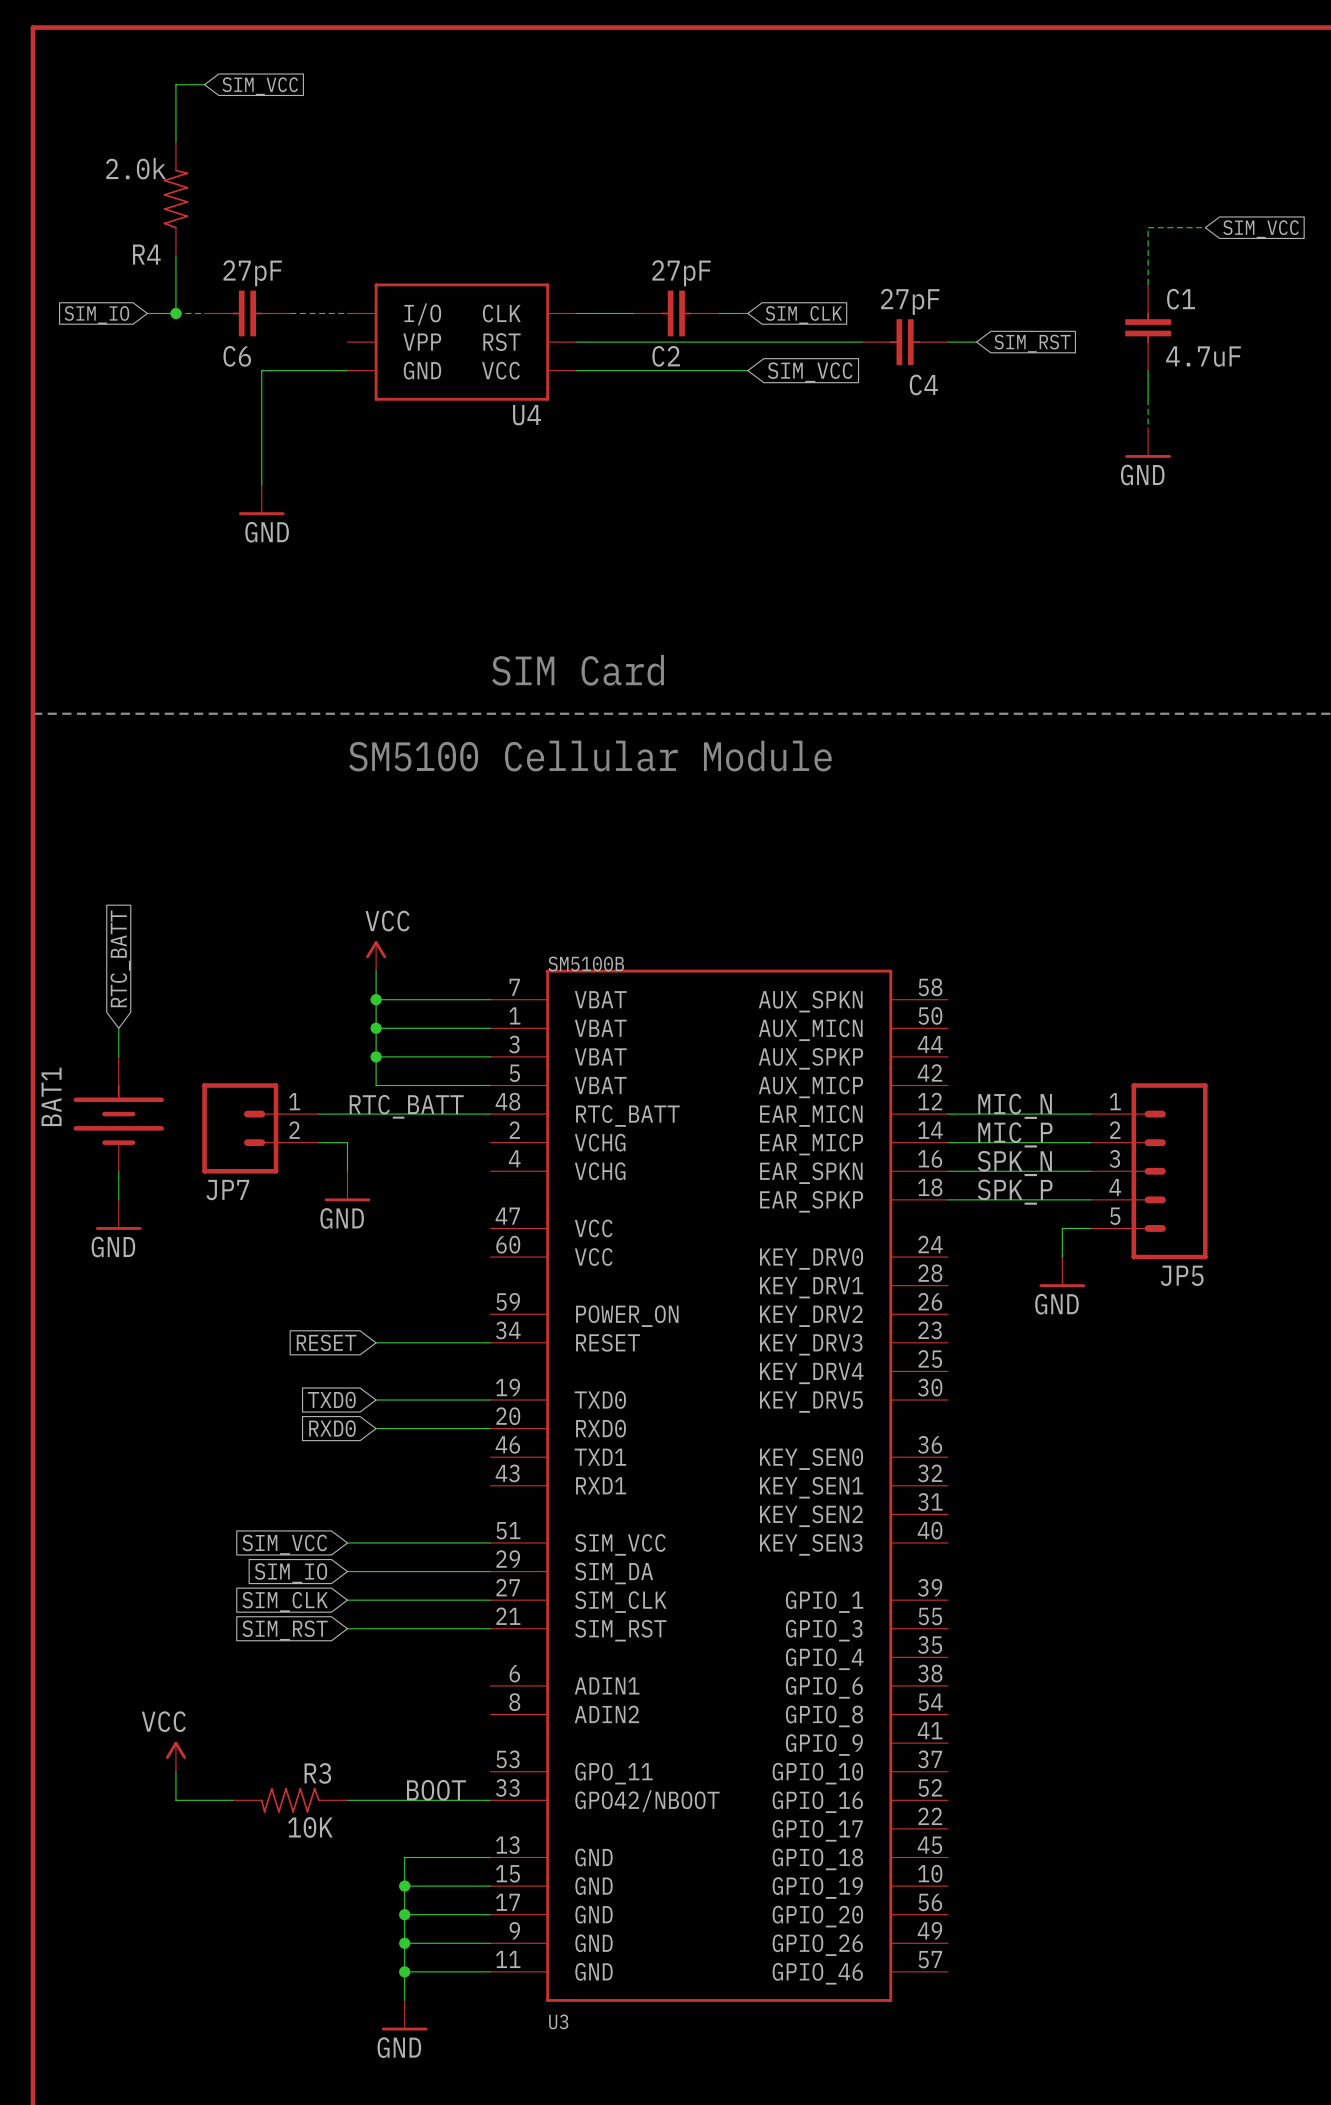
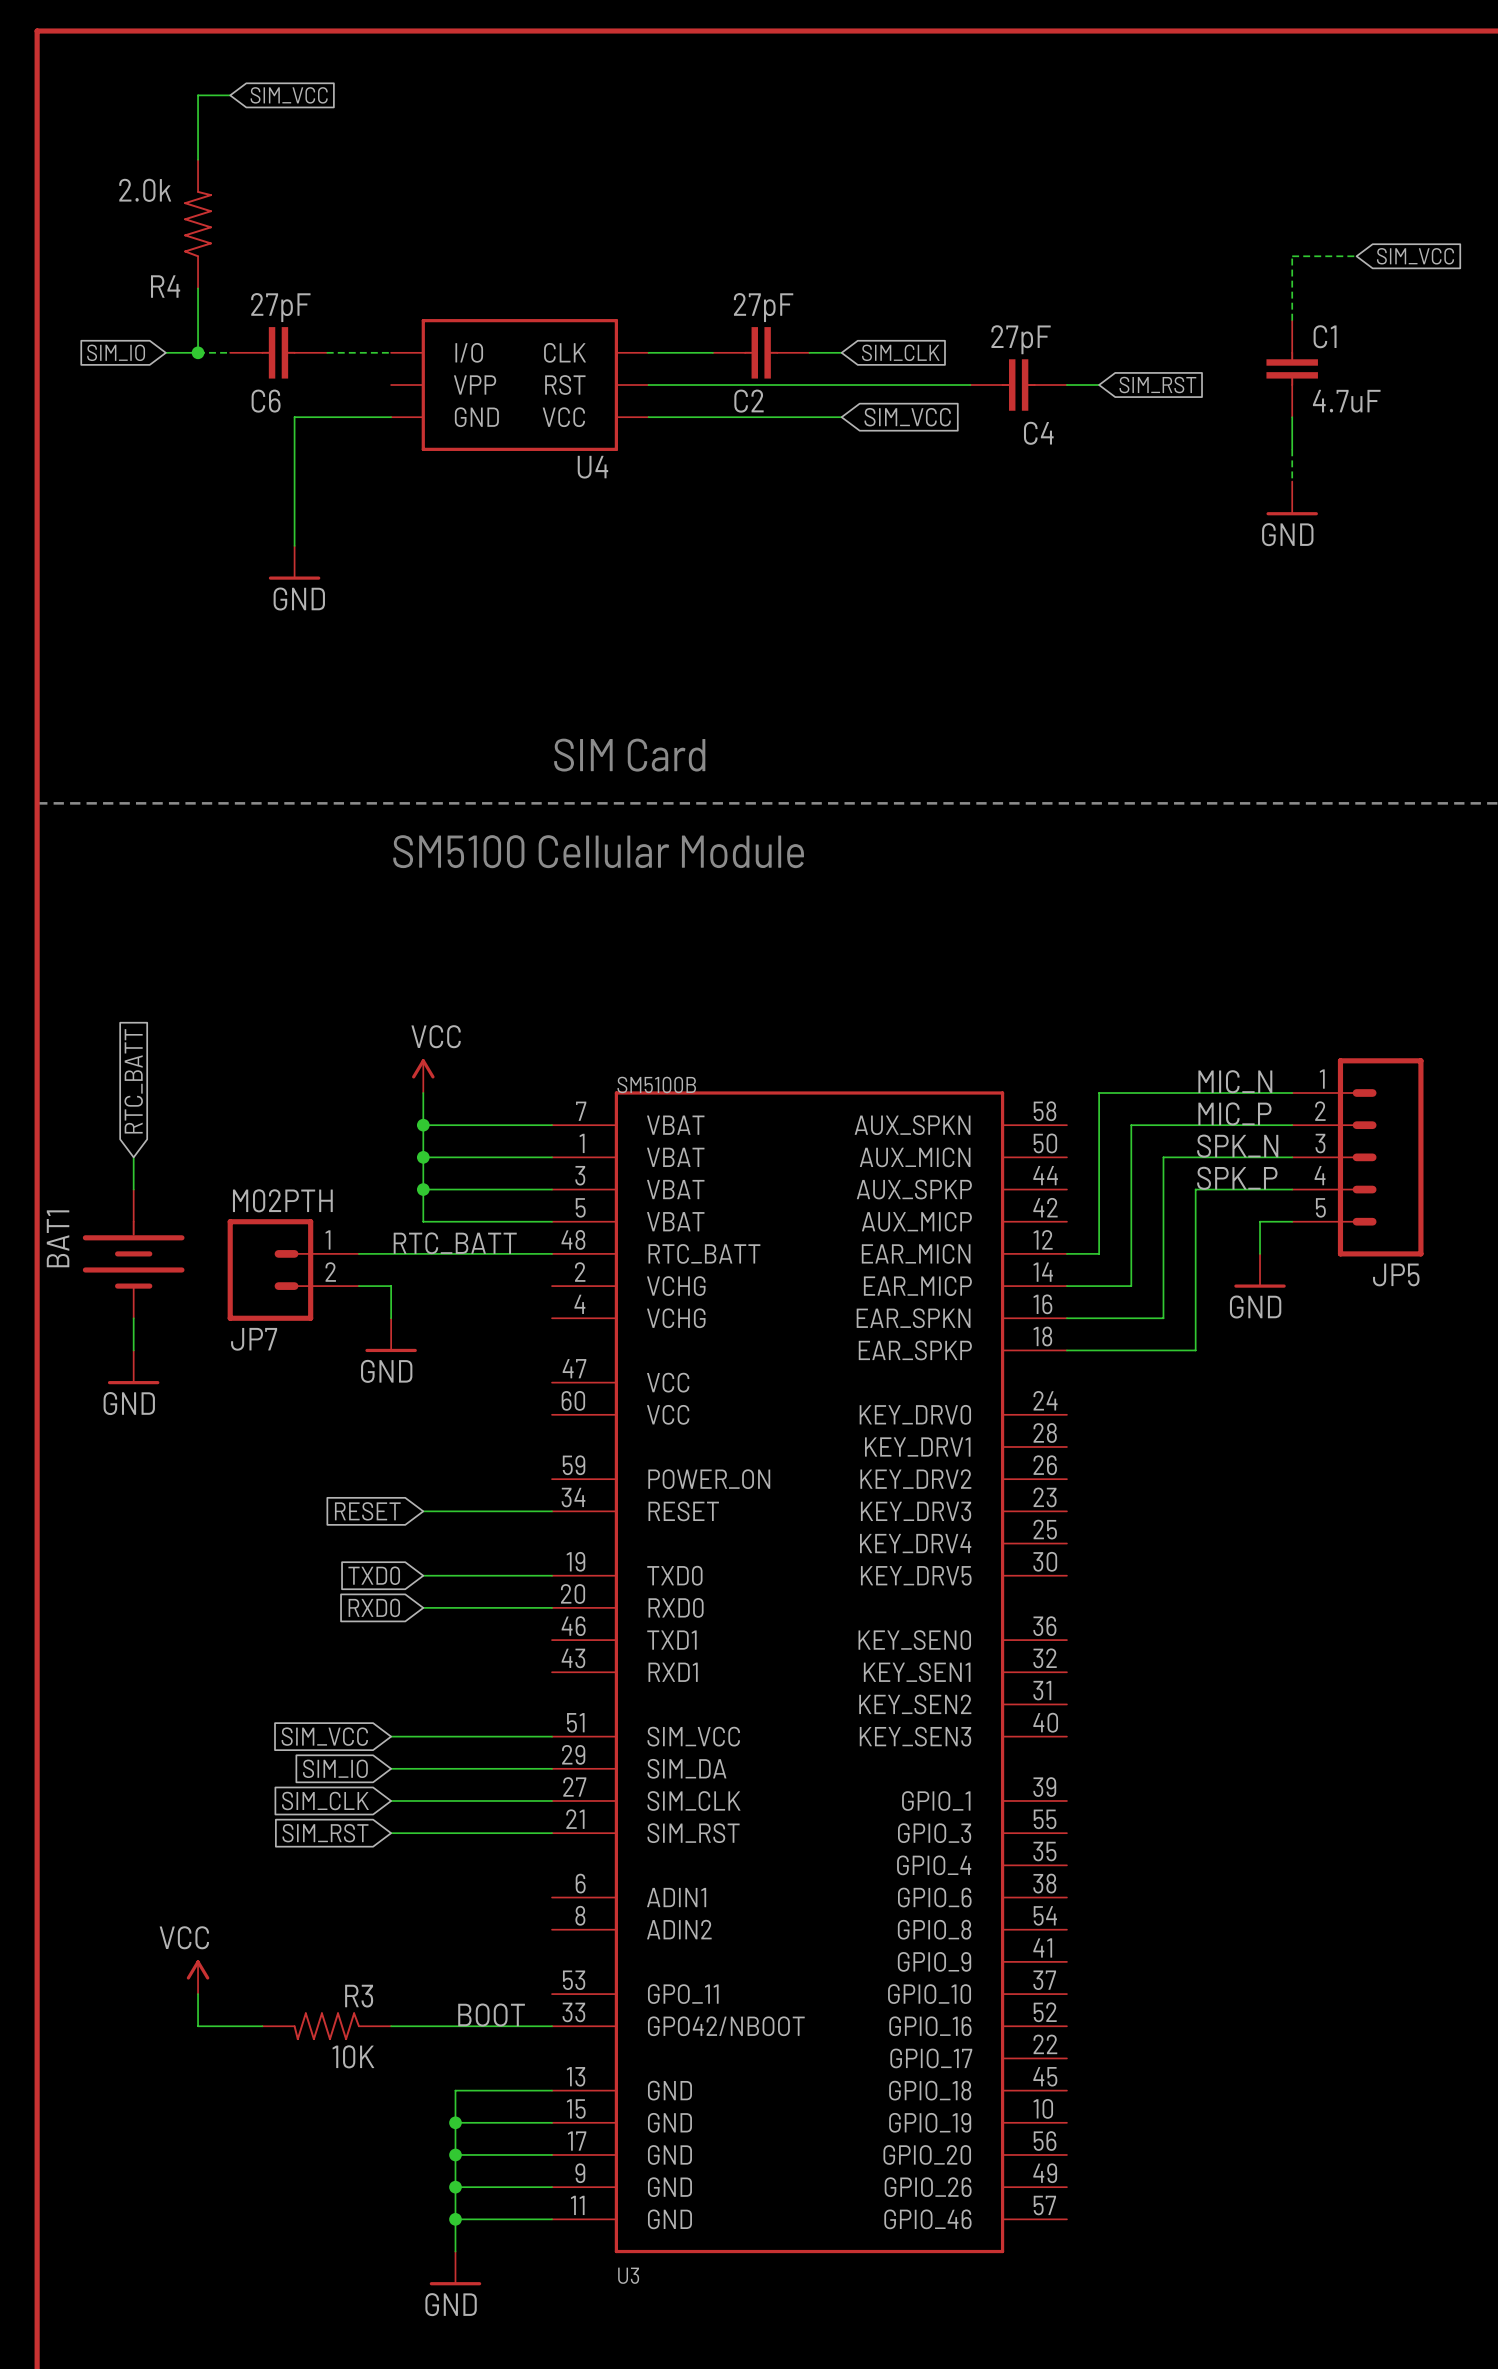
JP7 value: none -> M02PTH (282, 1200)
label position: MIC_N (1015, 1106) -> MIC_N (1235, 1081)
wire: (976, 1114) (1090, 1114) -> (1099, 1253) (1099, 1092) (1292, 1092)
label position: MIC_P (1015, 1134) -> MIC_P (1234, 1113)
wire: (1005, 1142) (1090, 1142) -> (1131, 1286) (1131, 1125) (1292, 1125)
label position: SPK_N (1014, 1163) -> SPK_N (1237, 1146)
wire: (1033, 1171) (1090, 1171) -> (1163, 1318) (1163, 1157) (1292, 1157)
JP5 position: (1149, 1171) -> (1357, 1157)
label position: SPK_P (1015, 1192) -> SPK_P (1237, 1178)
wire: (1062, 1199) (1090, 1199) -> (1195, 1350) (1195, 1189) (1292, 1189)
wire: (1090, 1228) (1062, 1228) (1062, 1257) -> (1292, 1221) (1260, 1221) (1260, 1253)
power symbol position: GND (1062, 1272) -> GND (1260, 1270)

